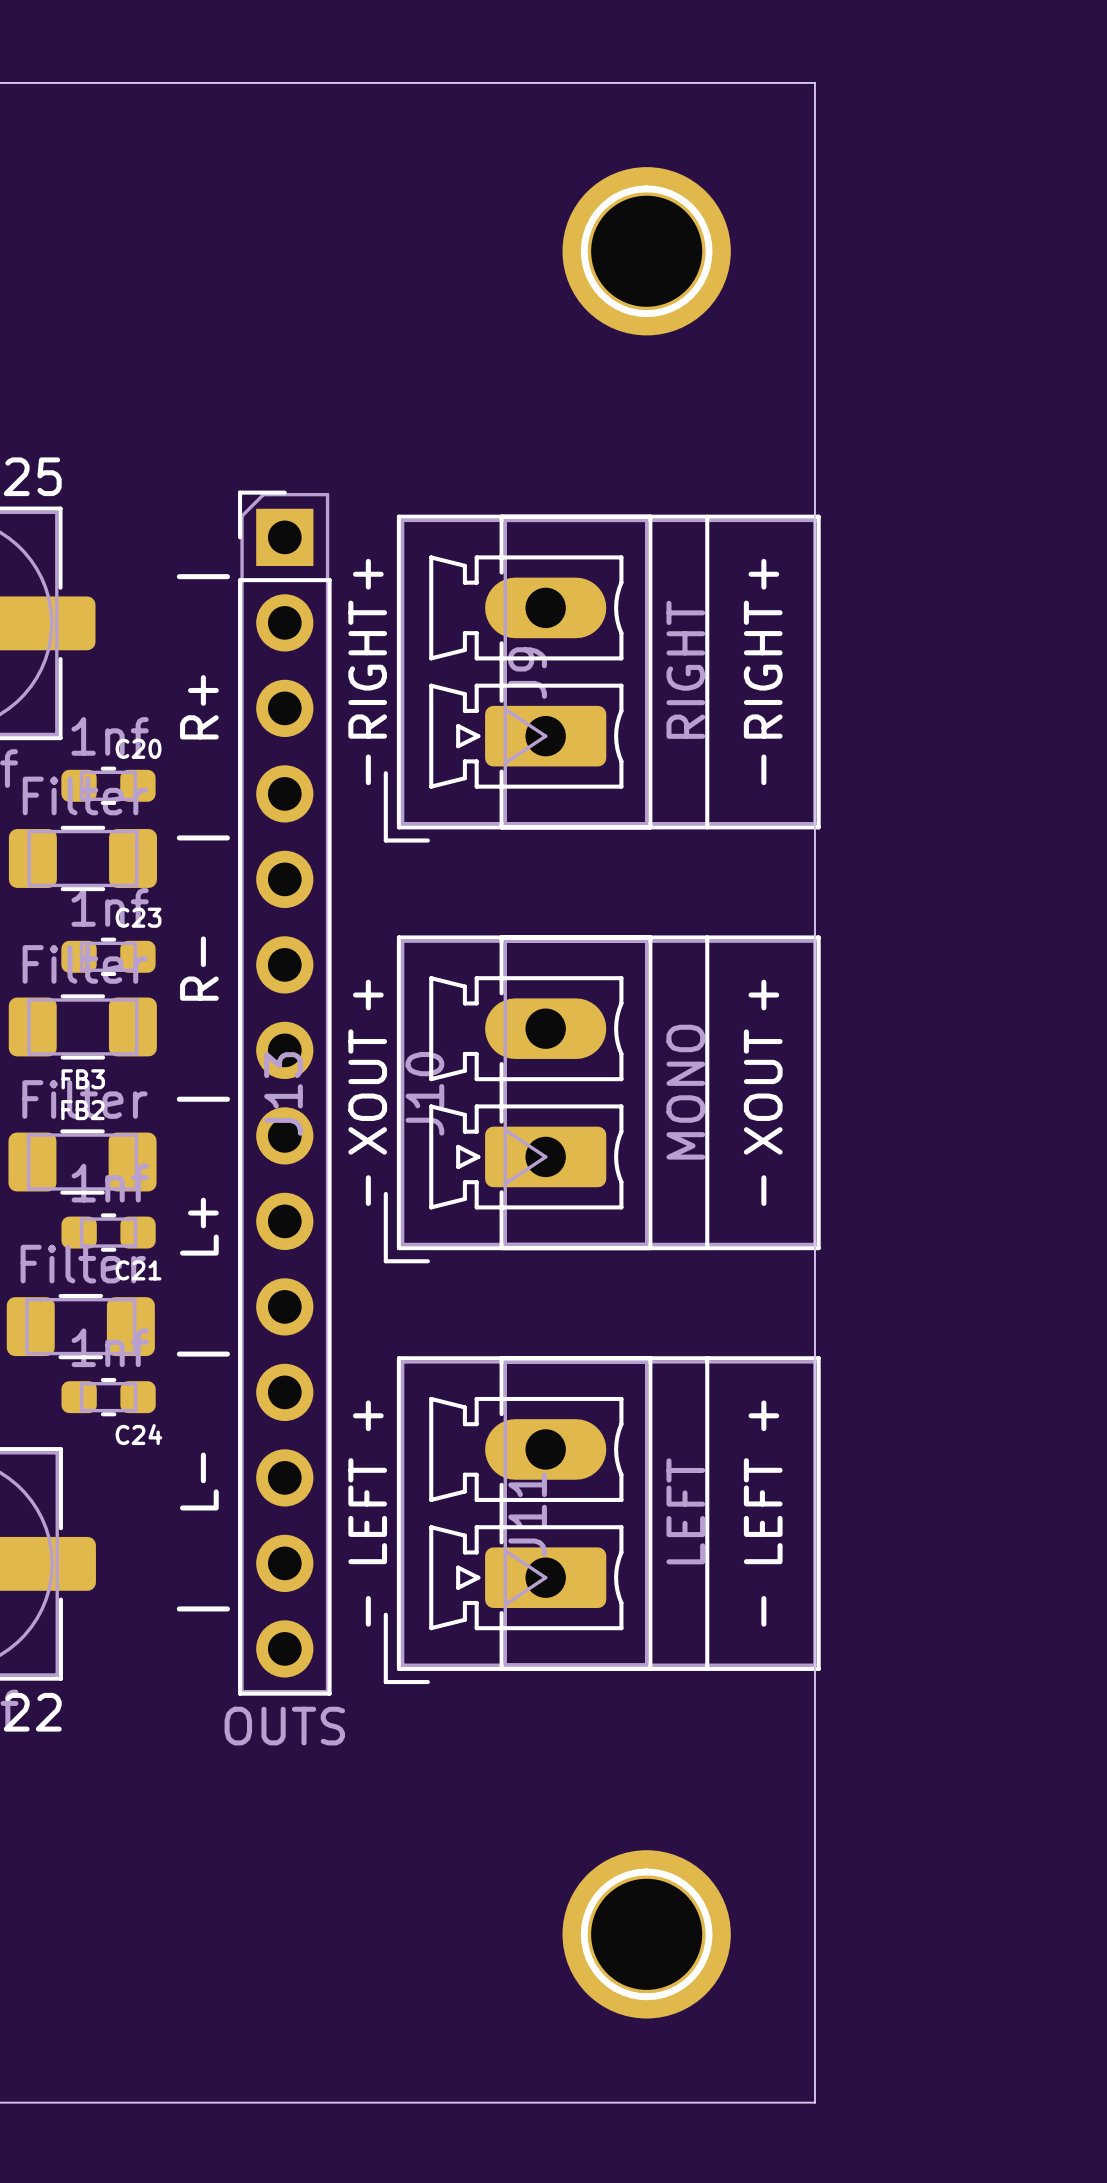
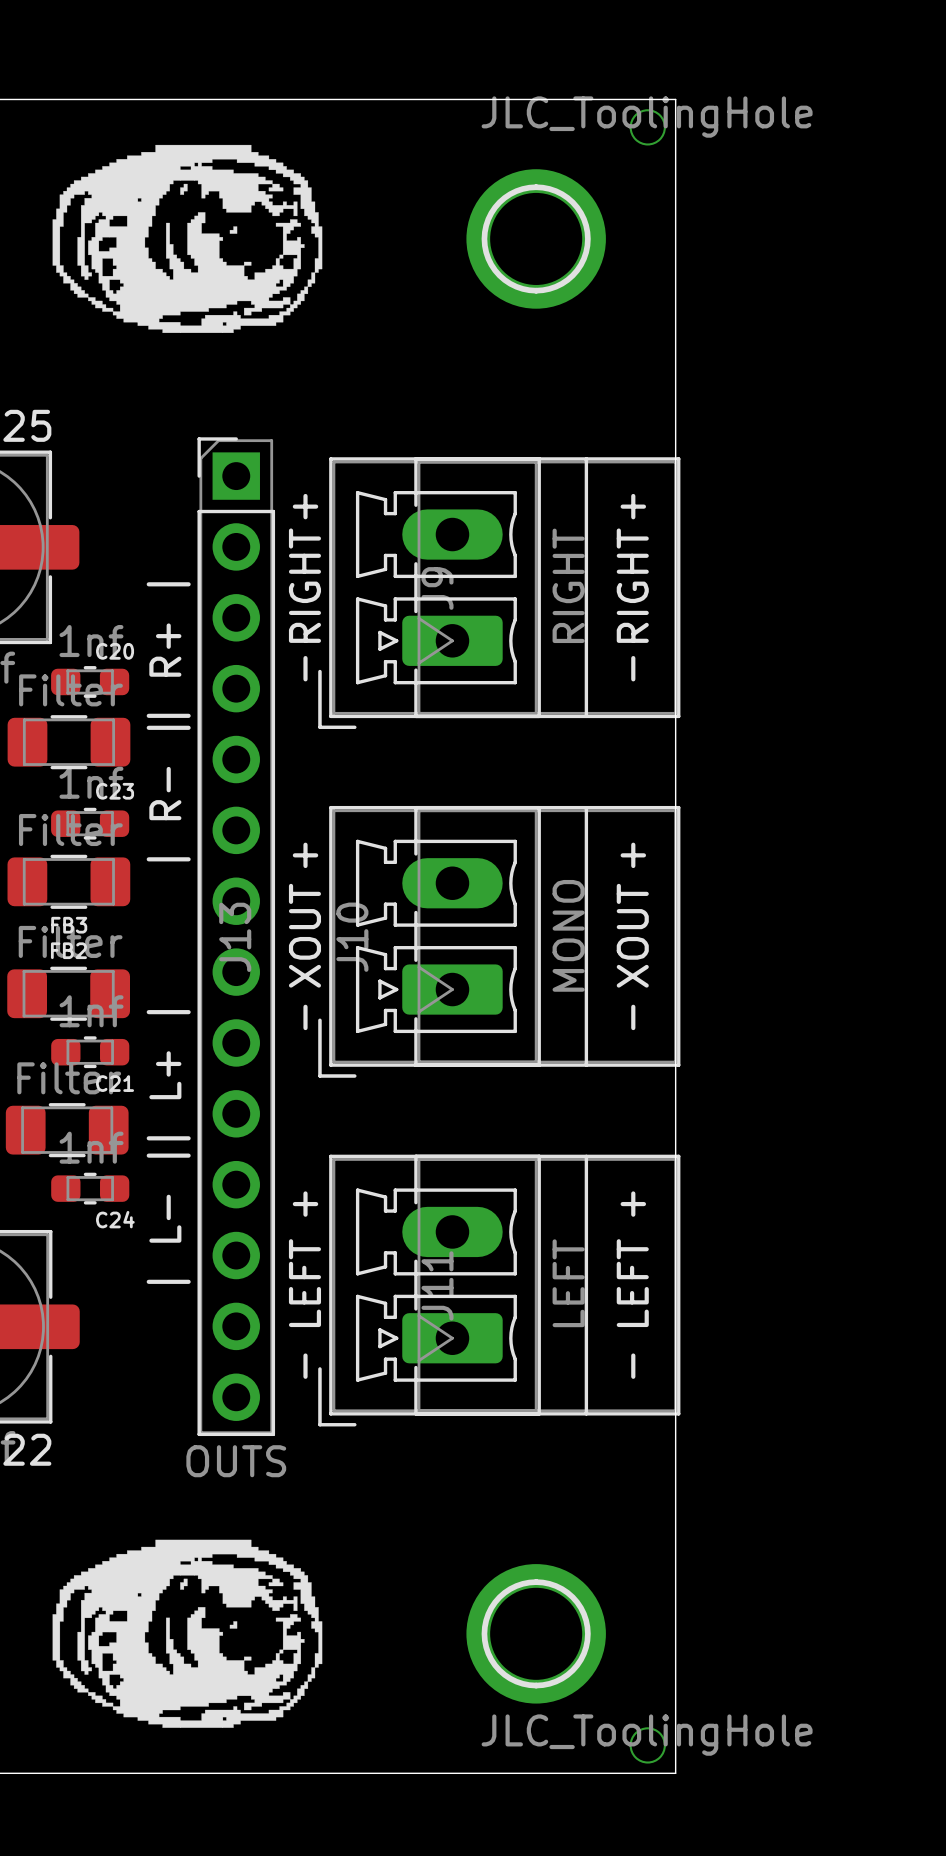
part: none -> JLC_ToolingHole (647, 127)
drawing: none -> [52, 144, 323, 333]
text: none -> | R+ | (168, 650)
text: none -> | R- | (168, 793)
text: | L- | L+ | R- | R+ | (203, 1092) -> none
text: none -> | L+ | (168, 1075)
text: none -> | L- | (168, 1218)
drawing: none -> [52, 1539, 323, 1728]
part: none -> JLC_ToolingHole (647, 1745)

